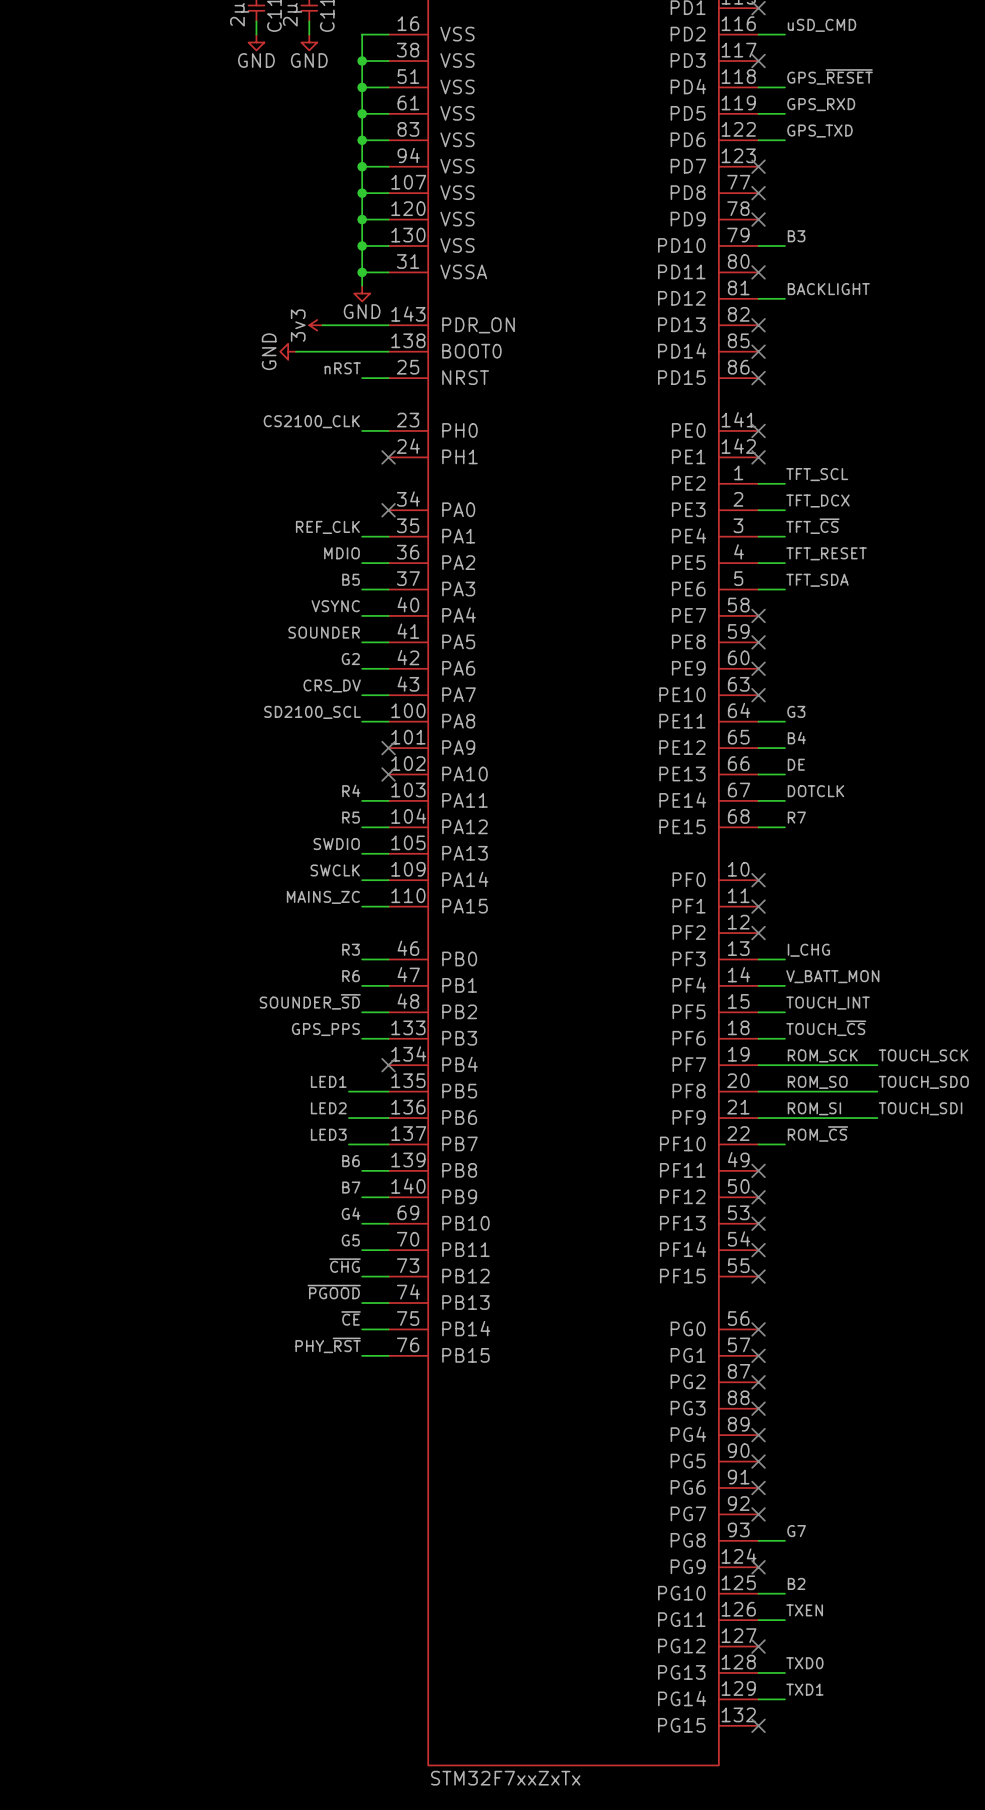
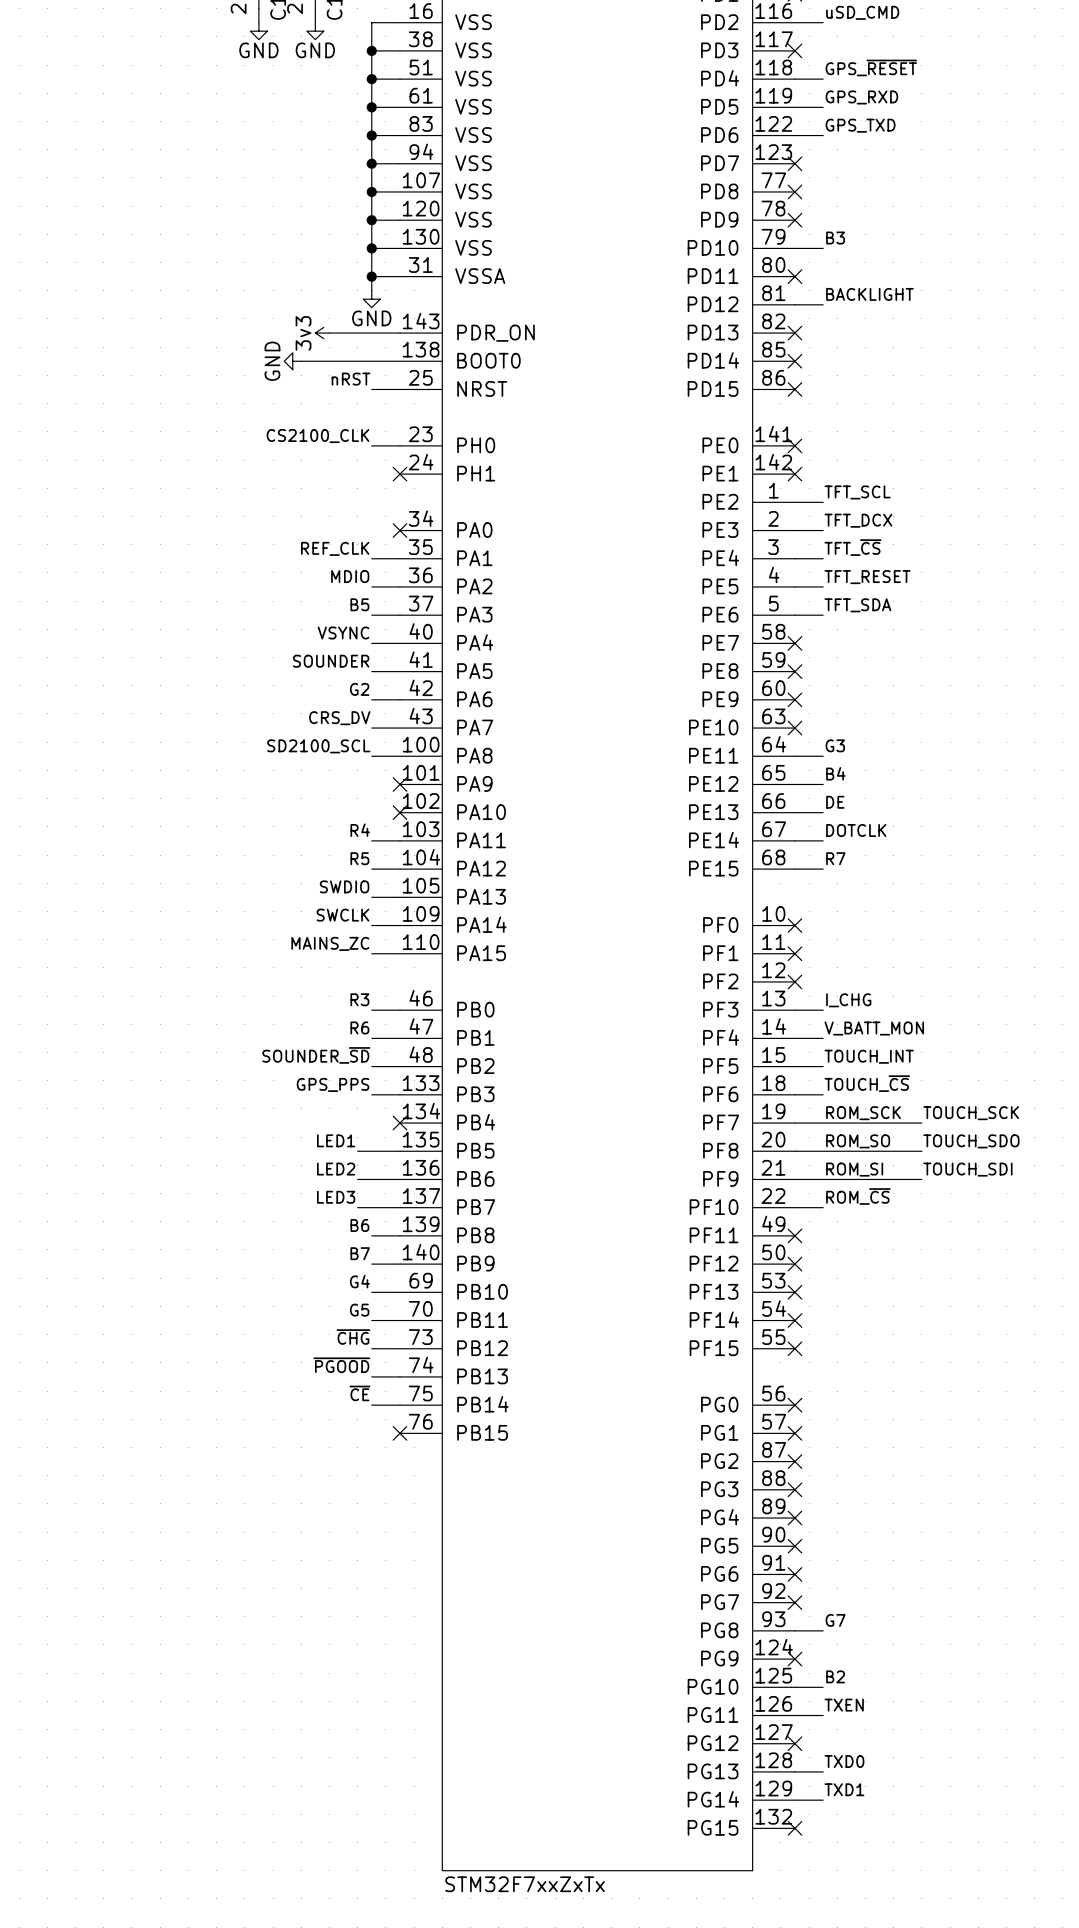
label: PHY_~{RST} (328, 1345) -> none
wire: (362, 1355) (388, 1355) -> none
no-connect mark: none -> (399, 1433)

